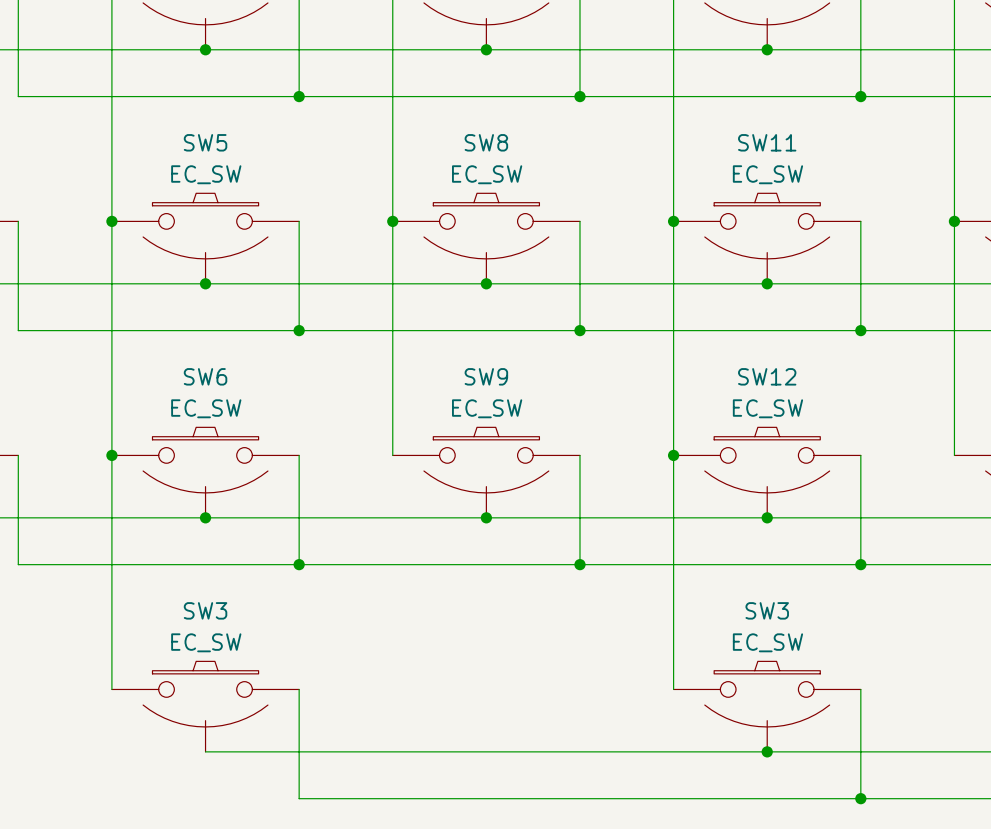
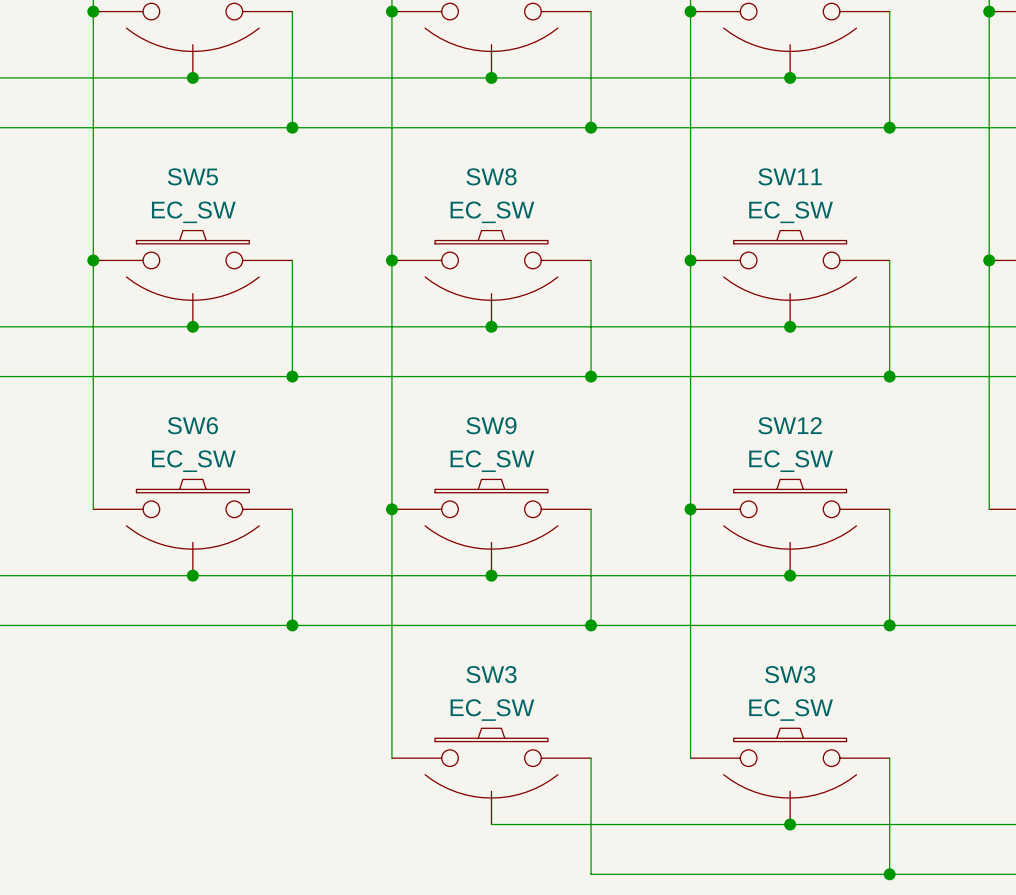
wire: (111, 455) (111, 689) -> (391, 509) (391, 758)
junction: (111, 455) -> none
junction: none -> (391, 509)
wire: (299, 689) (299, 798) (579, 798) -> (591, 758) (591, 874)
SW3 position: (205, 706) -> (491, 776)
wire: (205, 751) (486, 751) -> none

